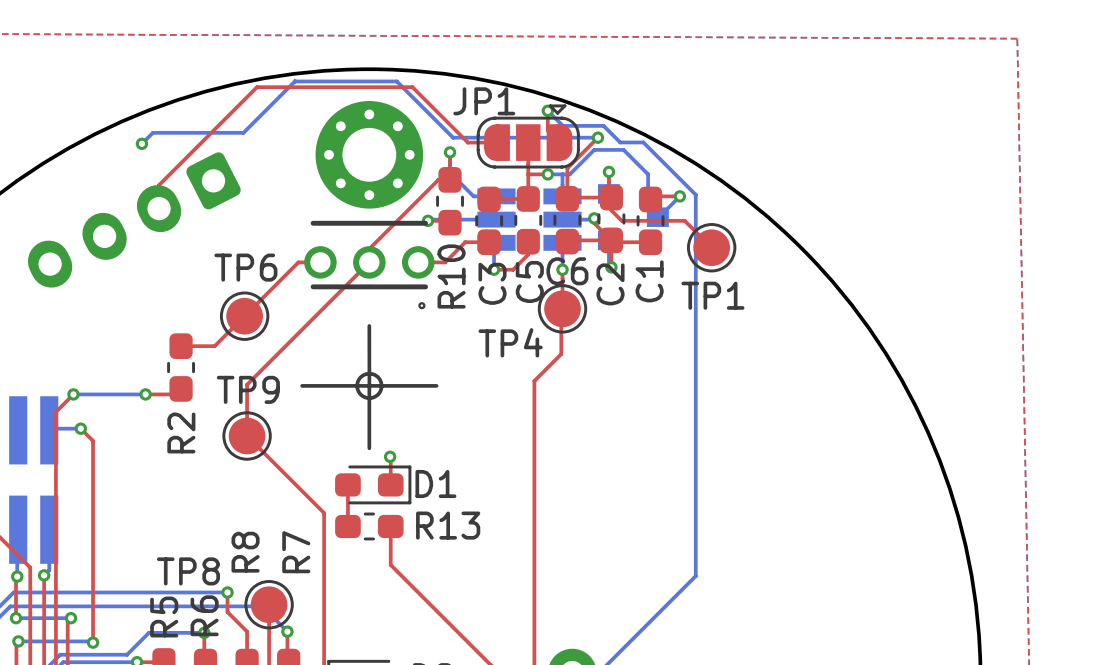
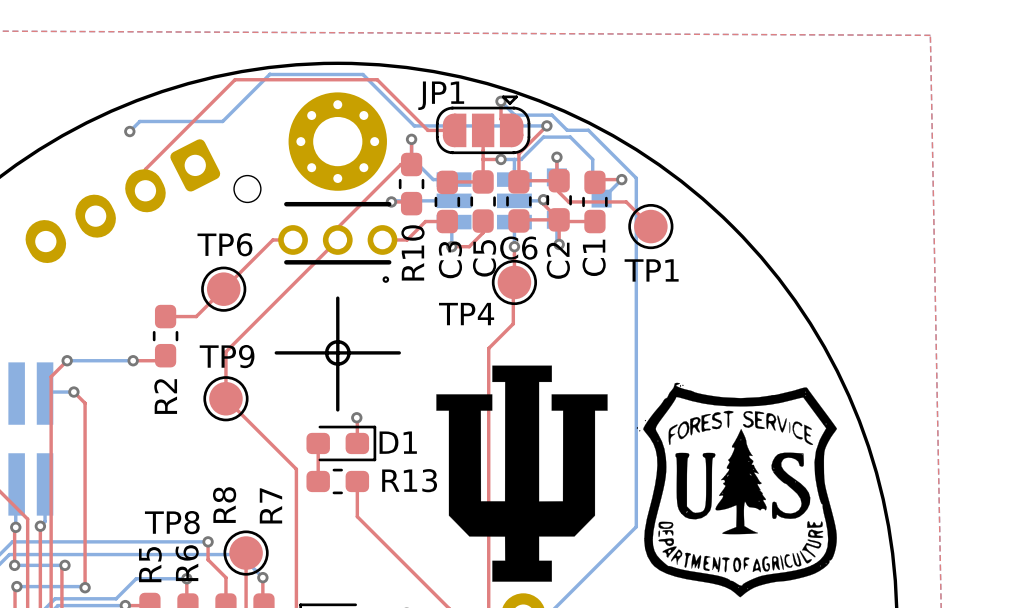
part footprint: [27, 152, 241, 288] -> [25, 139, 261, 264]
drawing: none -> [436, 365, 608, 582]
drawing: none -> [636, 382, 837, 598]

